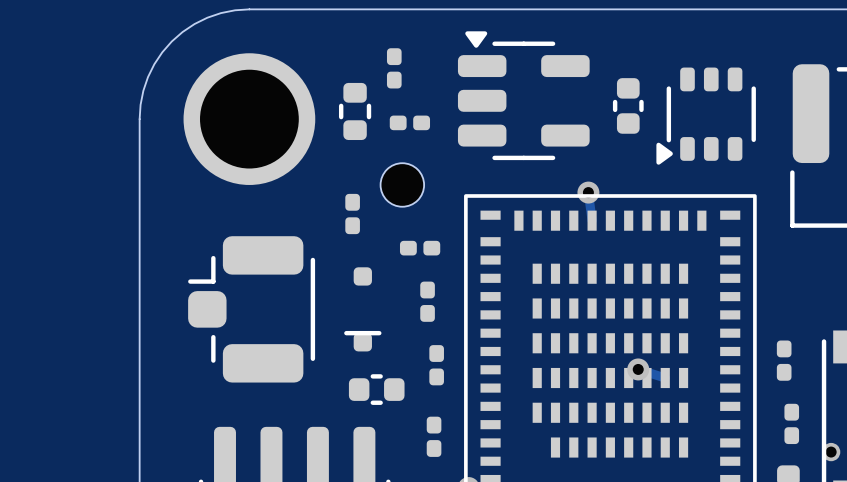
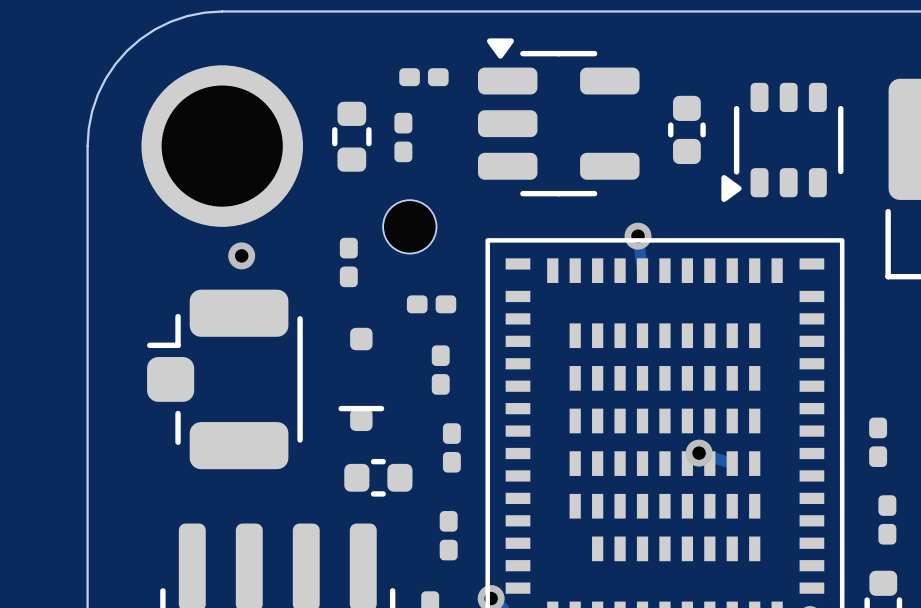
part rotation: 0° (394, 68) -> 90° clockwise (423, 77)
part rotation: 0° (409, 122) -> 90° clockwise (403, 137)
via: none -> (241, 255)

